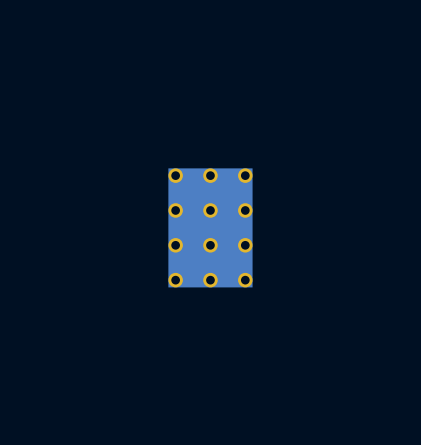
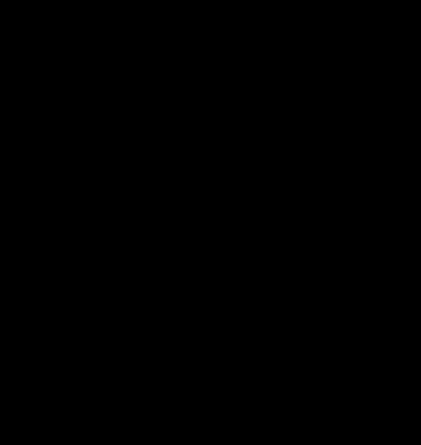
part: (210, 227) -> none

